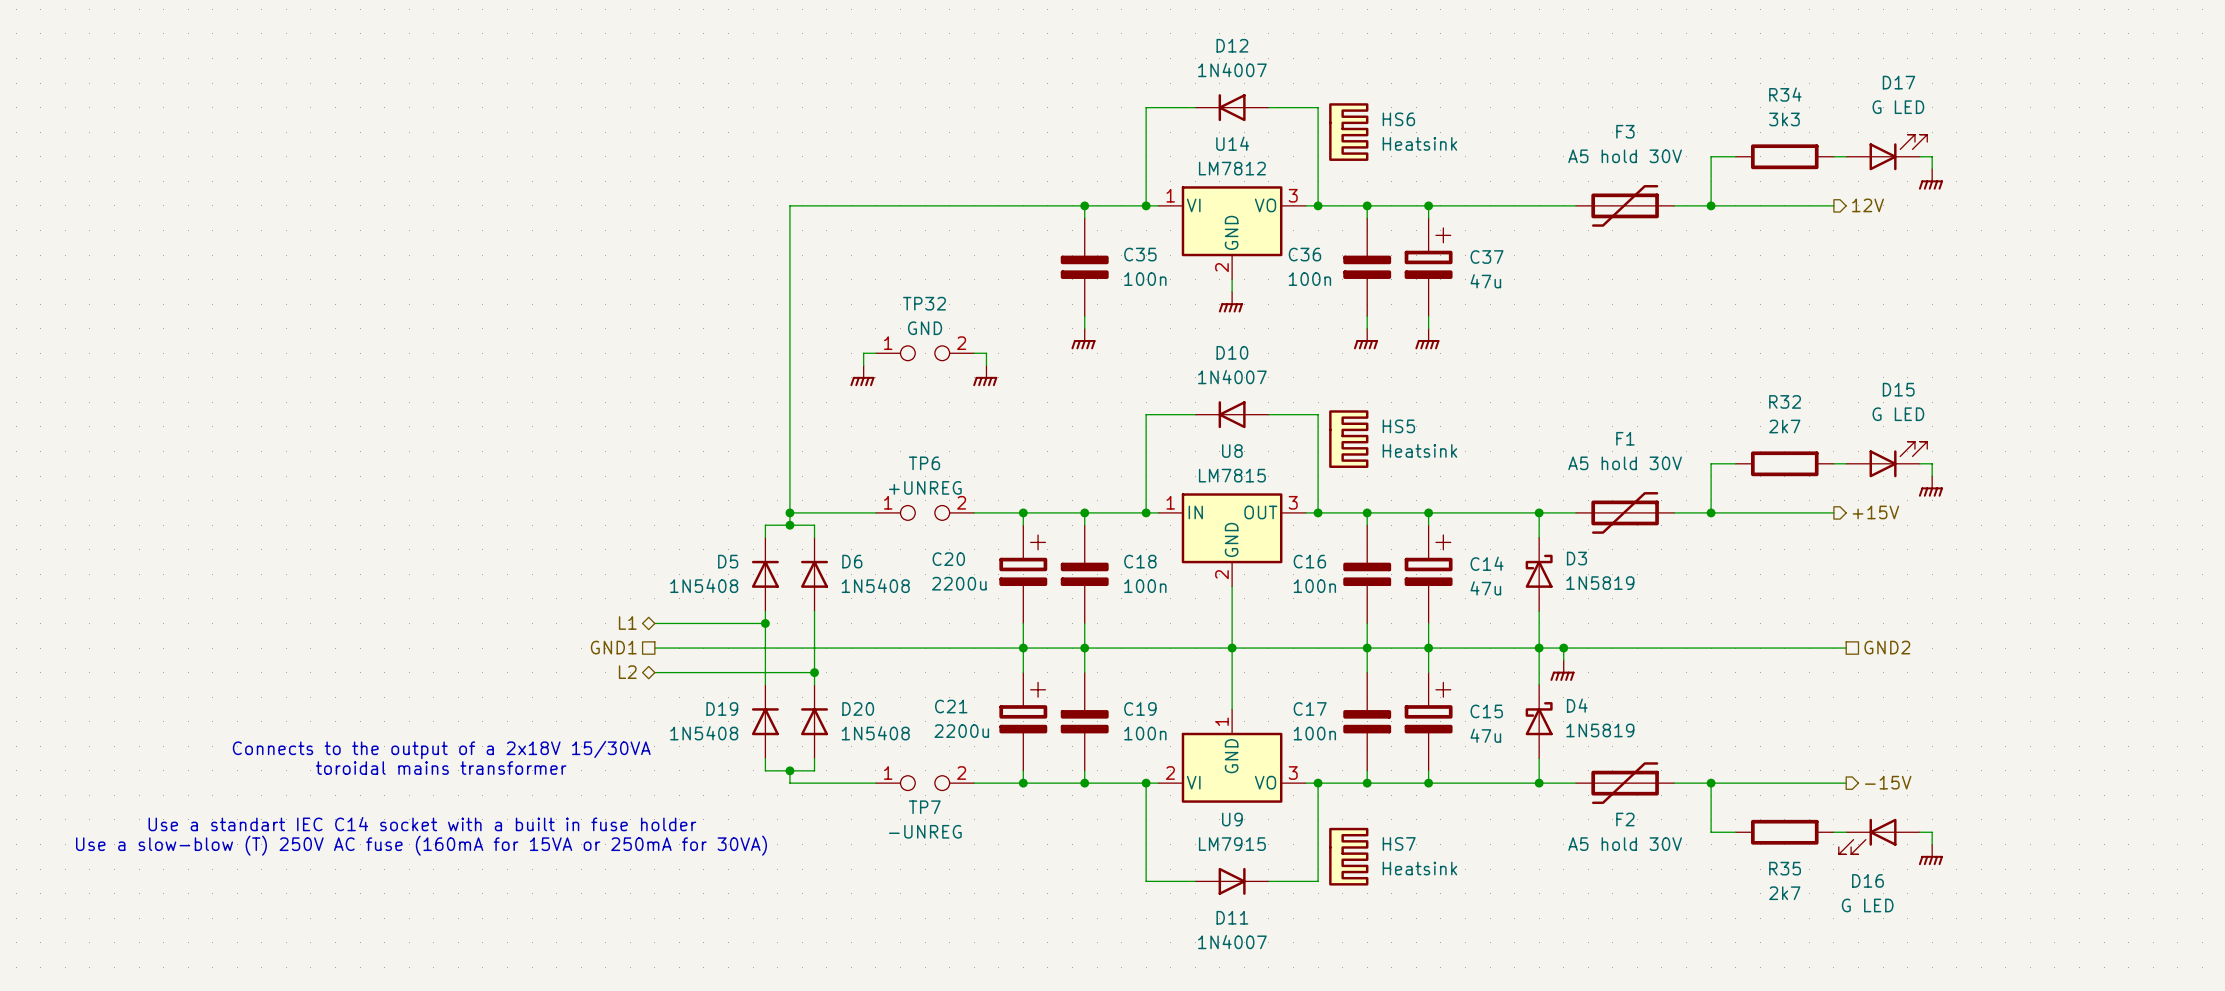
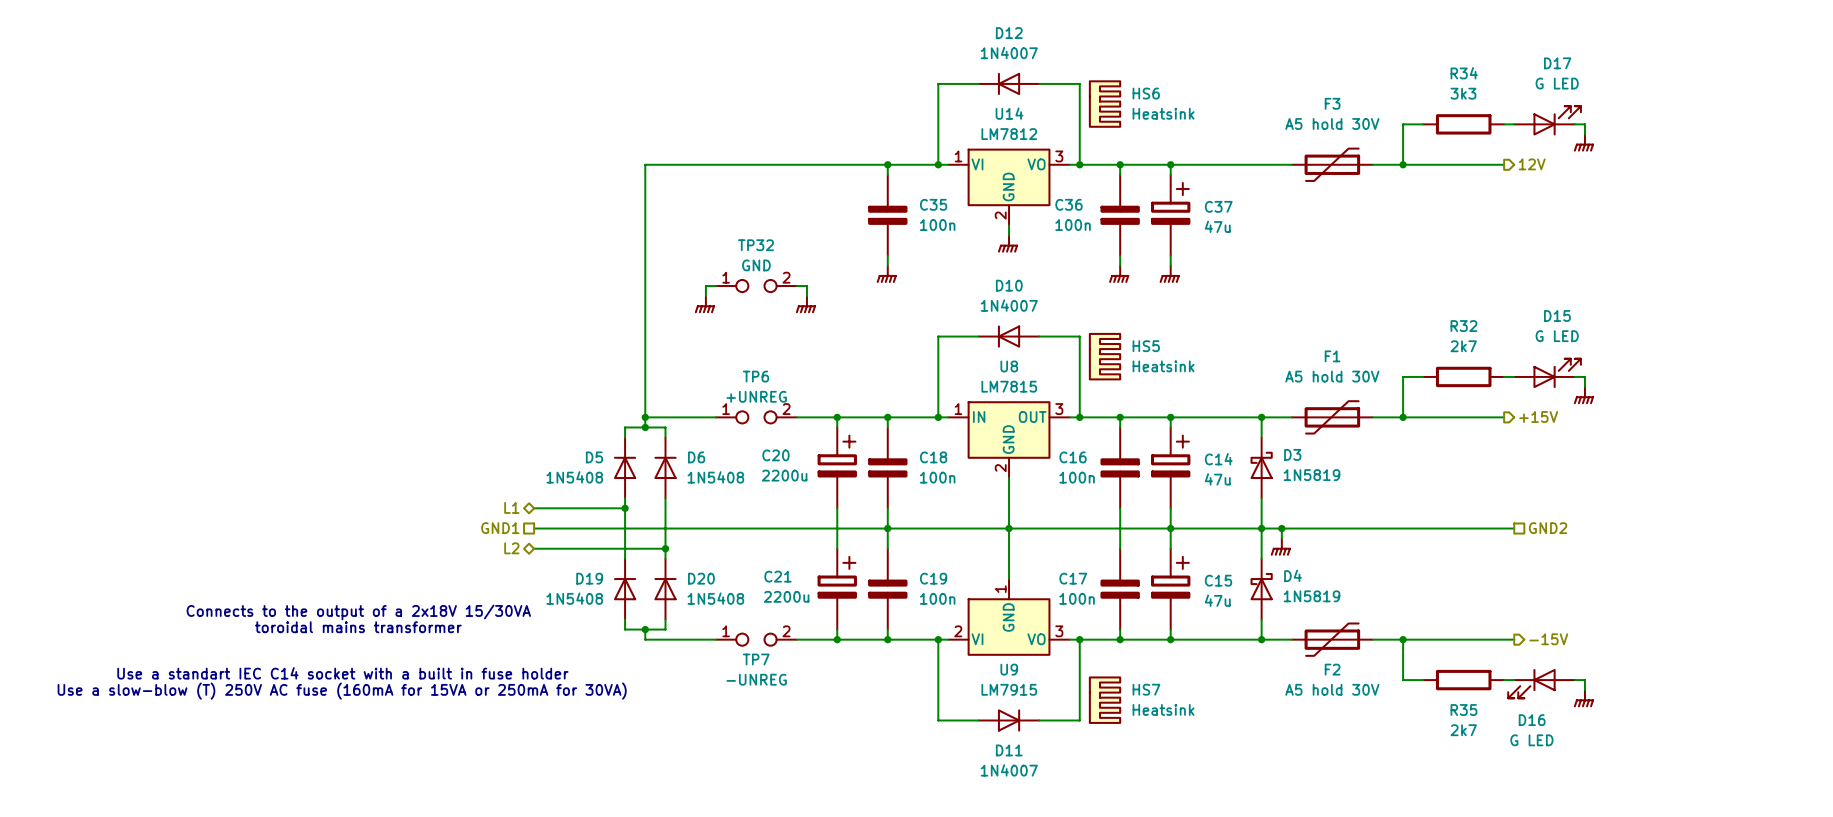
junction: (1023, 648) -> none
junction: (1367, 648) -> none

